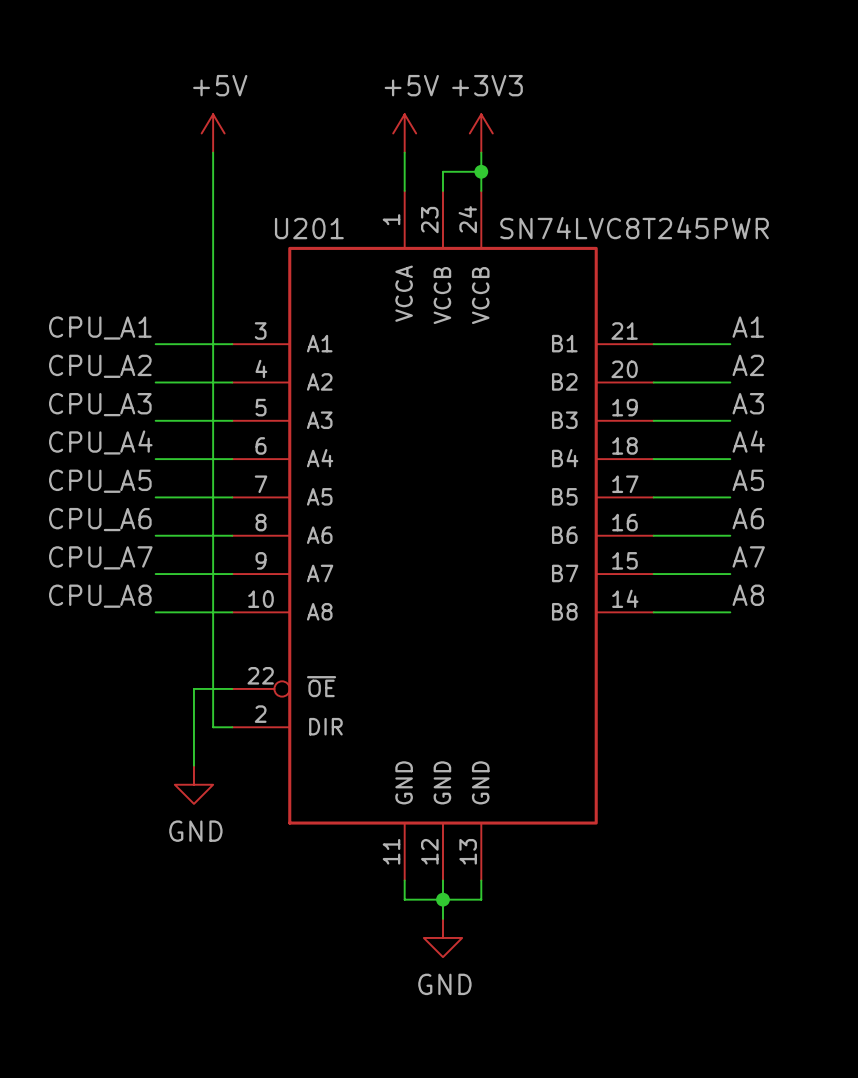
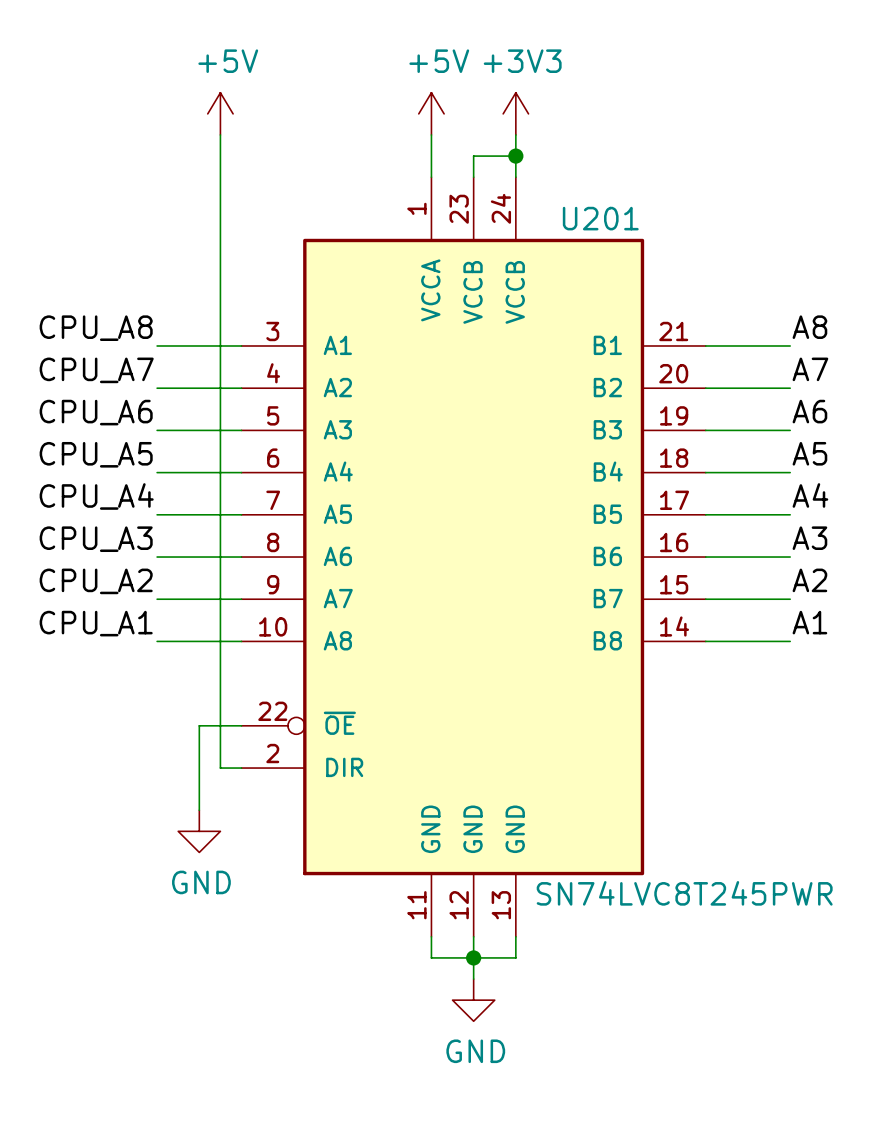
U201 name position: U201 (309, 228) -> U201 (600, 218)
U201 value position: SN74LVC8T245PWR (634, 228) -> SN74LVC8T245PWR (684, 893)
label: A1 (748, 327) -> A8 (809, 327)
label: CPU_A1 (100, 328) -> CPU_A8 (96, 328)
label: A2 (748, 365) -> A7 (810, 369)
label: CPU_A2 (100, 366) -> CPU_A7 (96, 370)
label: A3 (748, 403) -> A6 (809, 411)
label: CPU_A3 (100, 404) -> CPU_A6 (96, 412)
label: A4 (748, 441) -> A5 (809, 453)
label: CPU_A4 (100, 442) -> CPU_A5 (96, 454)
label: A5 (748, 480) -> A4 (810, 495)
label: CPU_A5 (100, 481) -> CPU_A4 (96, 496)
label: A6 (748, 518) -> A3 (809, 538)
label: CPU_A6 (100, 519) -> CPU_A3 (96, 539)
label: A7 (748, 556) -> A2 (809, 580)
label: CPU_A7 (100, 557) -> CPU_A2 (96, 581)
label: A8 (748, 595) -> A1 (809, 622)
label: CPU_A8 (100, 596) -> CPU_A1 (96, 623)

